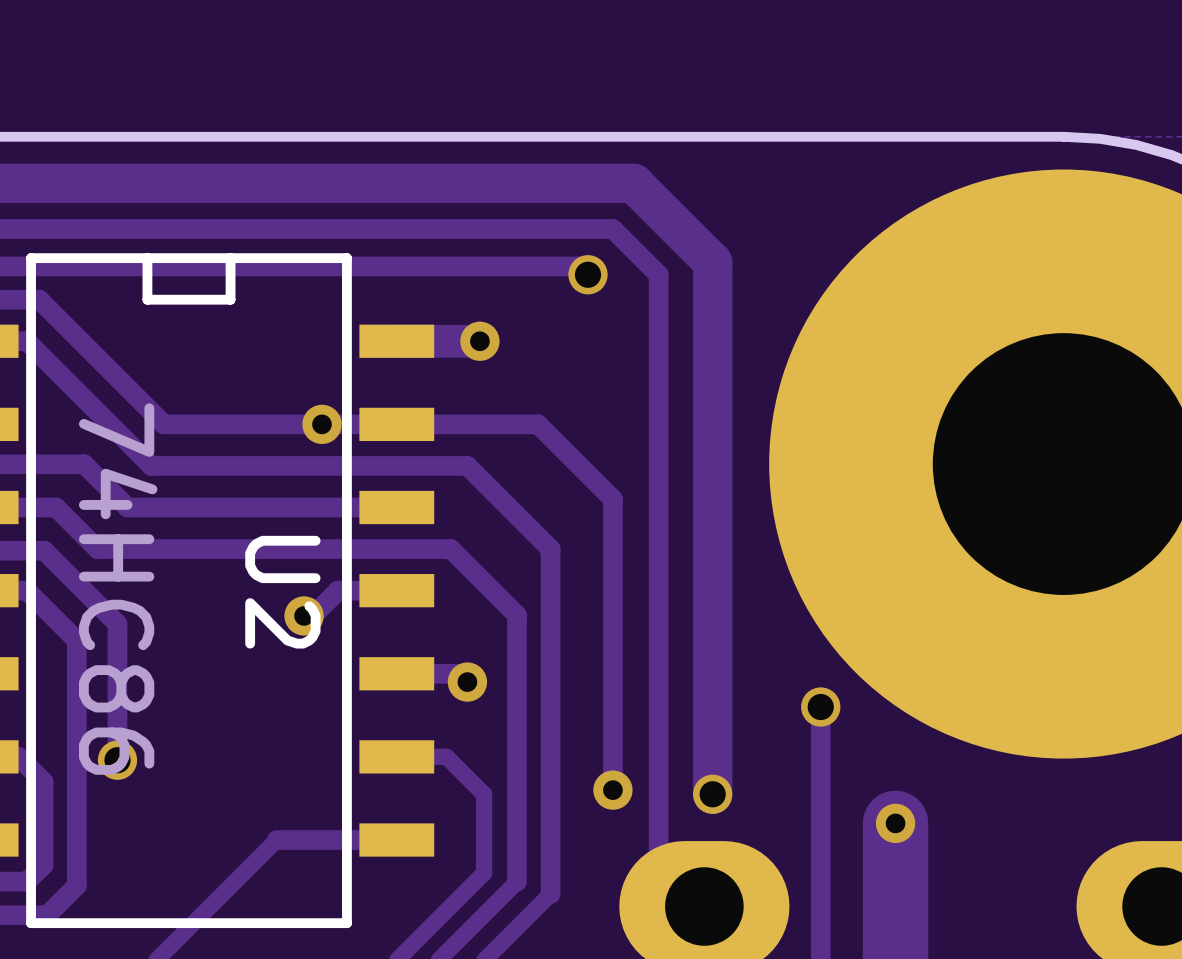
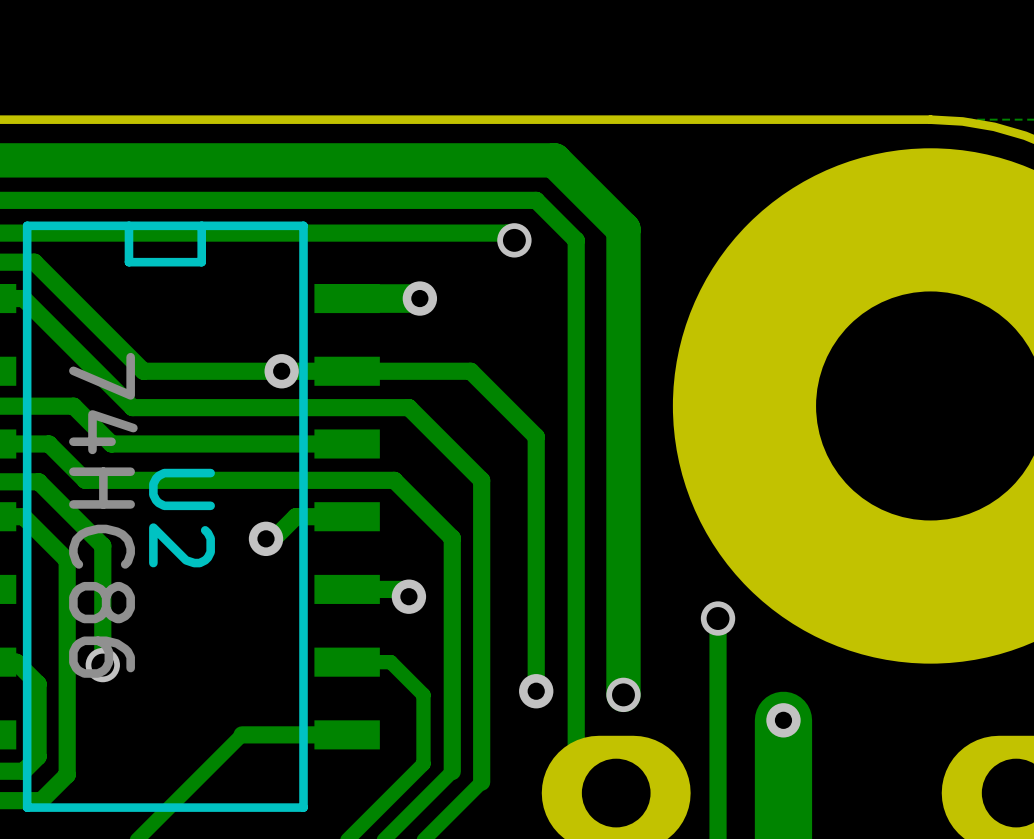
U2 name position: U2 (282, 592) -> U2 (182, 518)

